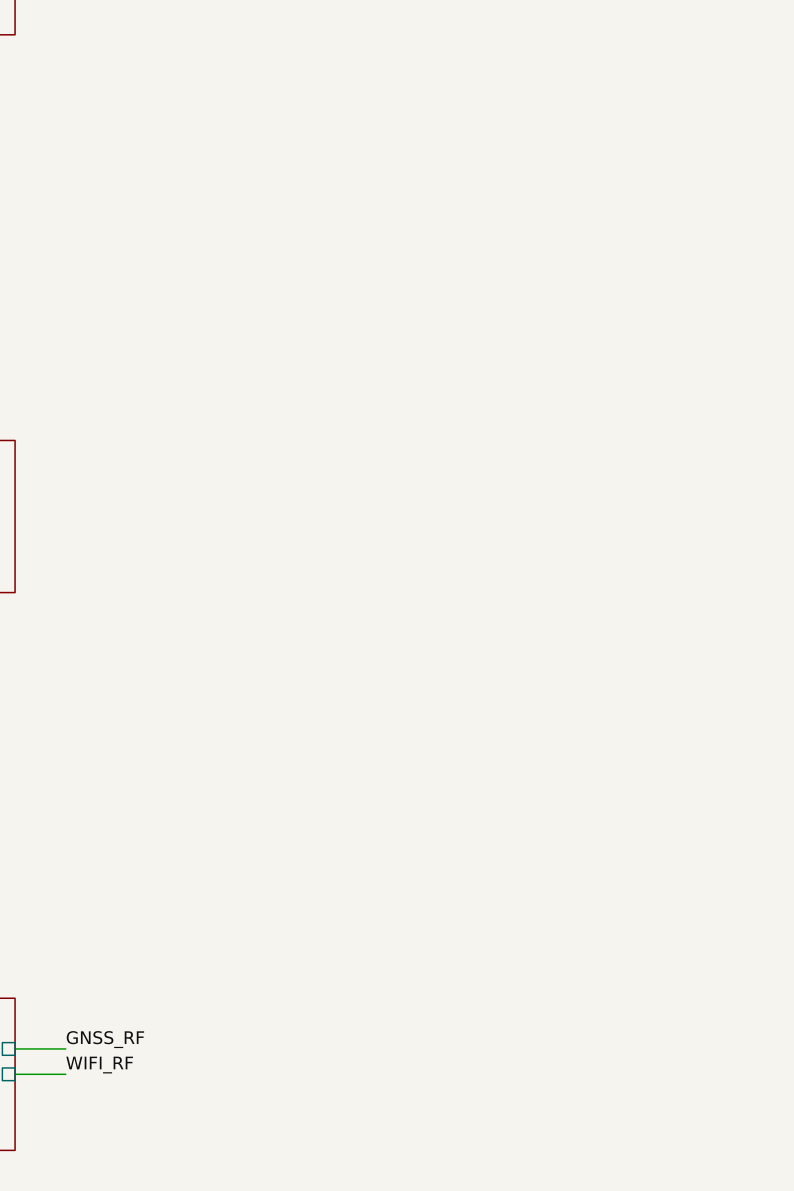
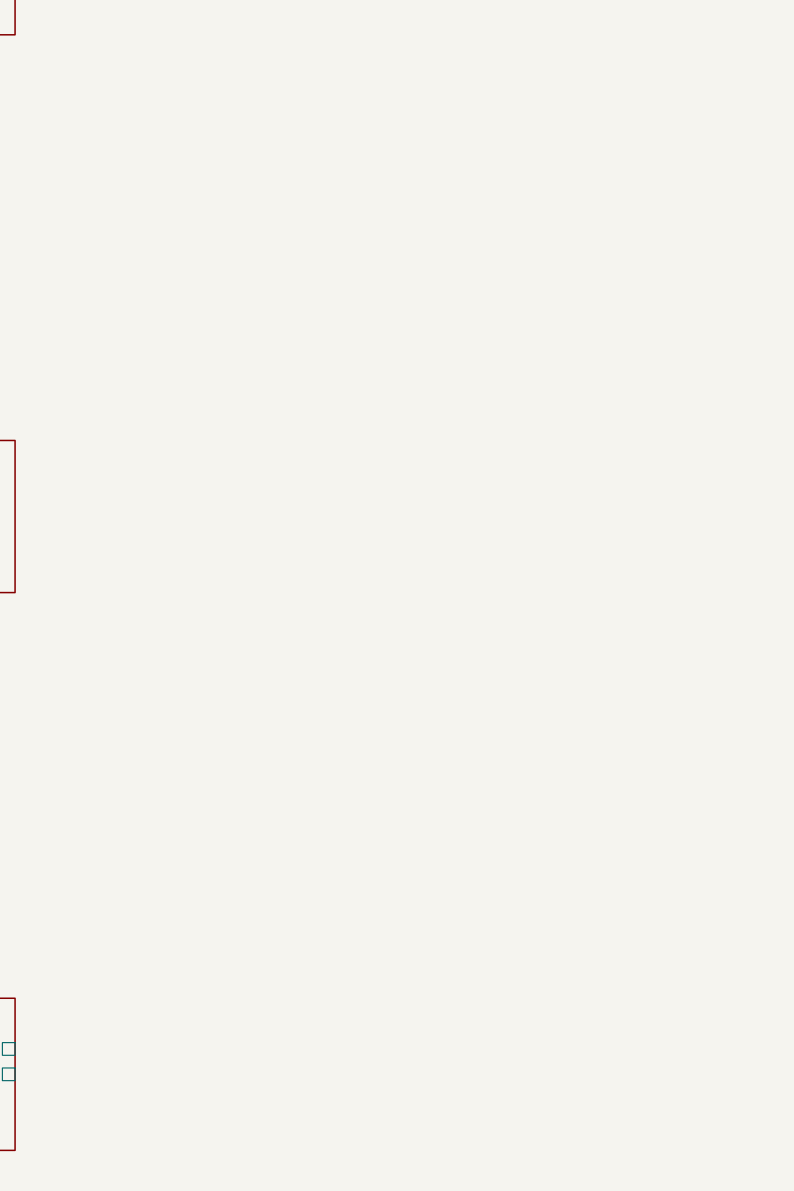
label: GNSS_RF (105, 1039) -> none
wire: (15, 1048) (65, 1048) -> none
label: WIFI_RF (99, 1065) -> none
wire: (15, 1074) (65, 1074) -> none

